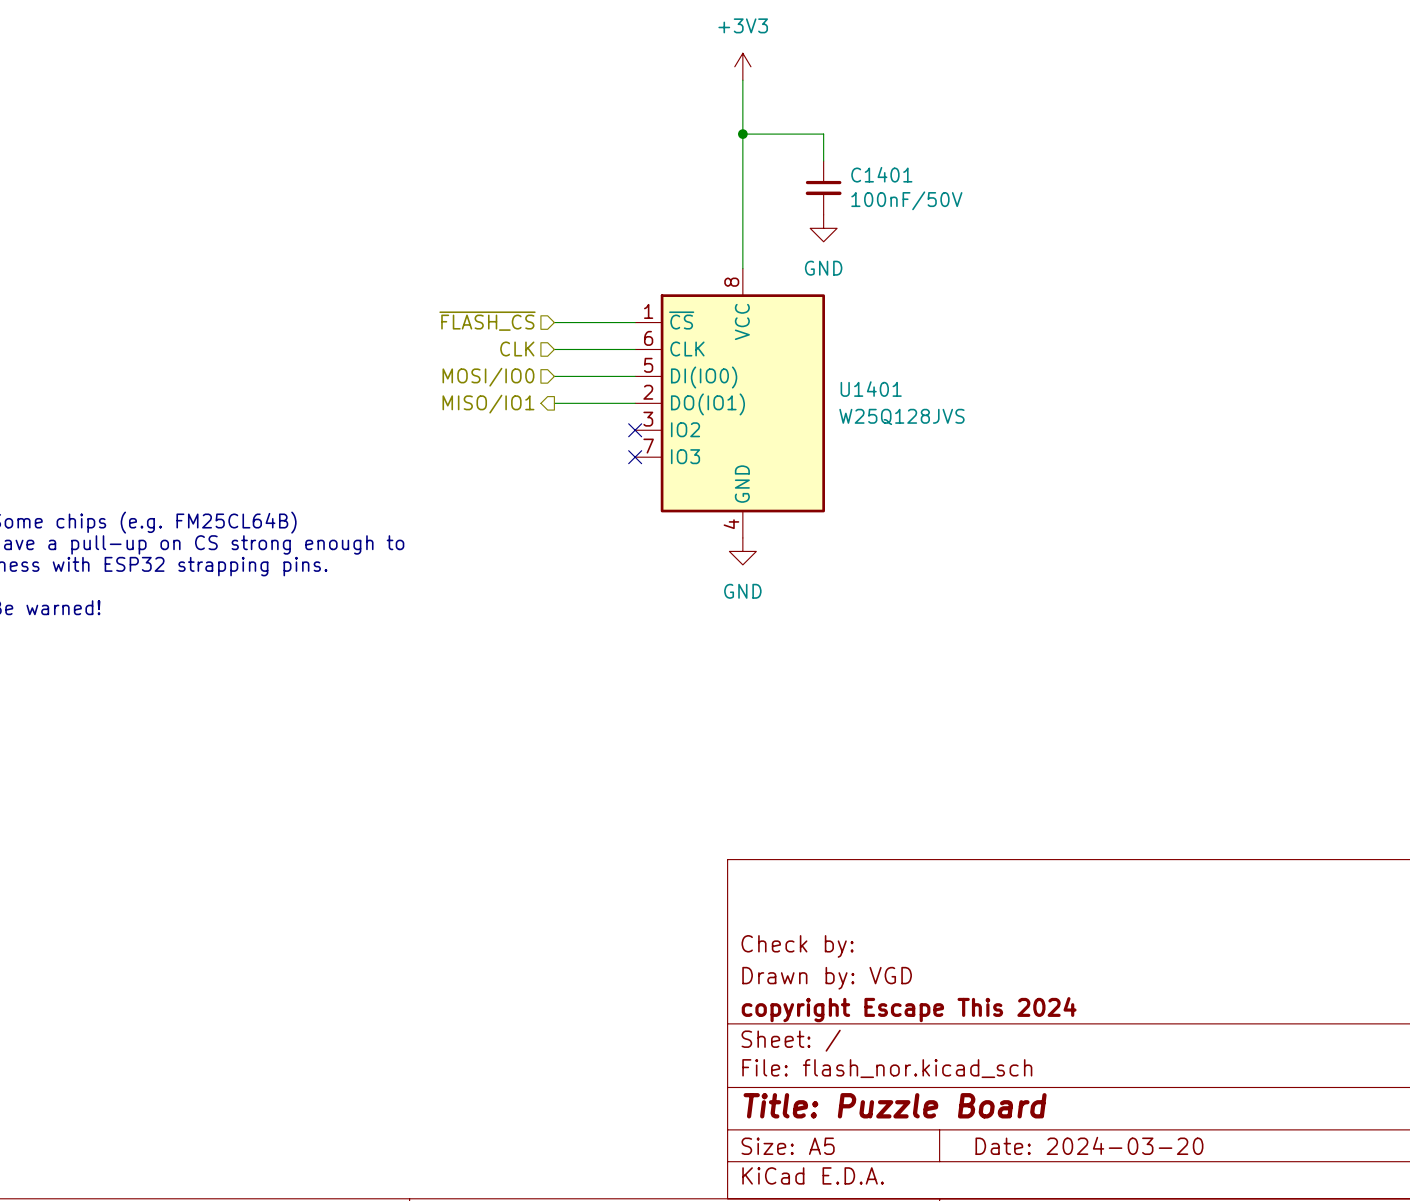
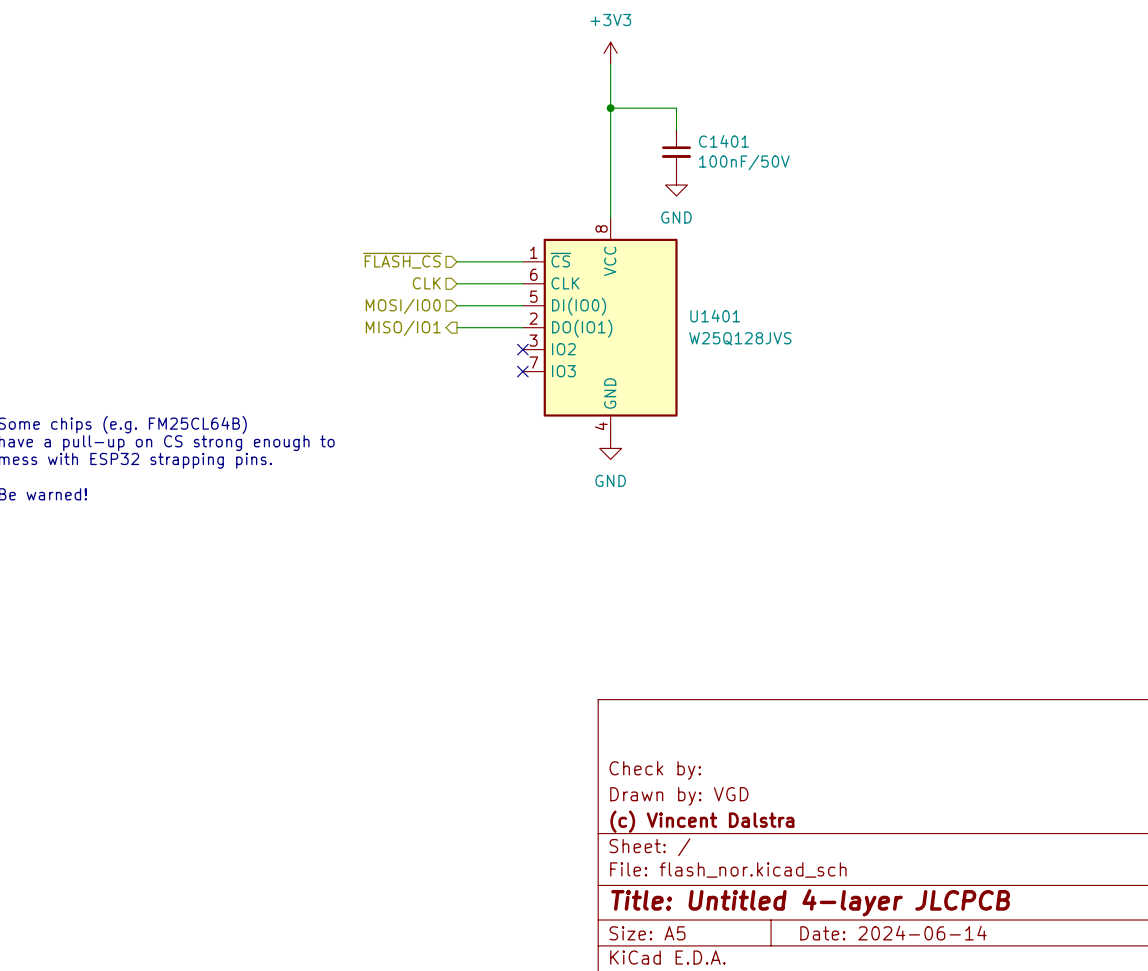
title block: copyright Escape This 2024 (909, 1009) -> (c) Vincent Dalstra (702, 821)
title block: Title: Puzzle Board (895, 1105) -> Title: Untitled 4-layer JLCPCB (810, 902)
title block: Date: 2024-03-20 (1089, 1145) -> Date: 2024-06-14 (893, 933)

